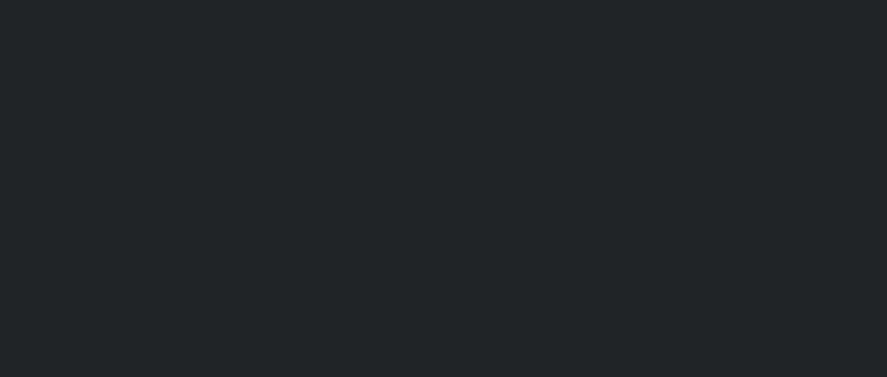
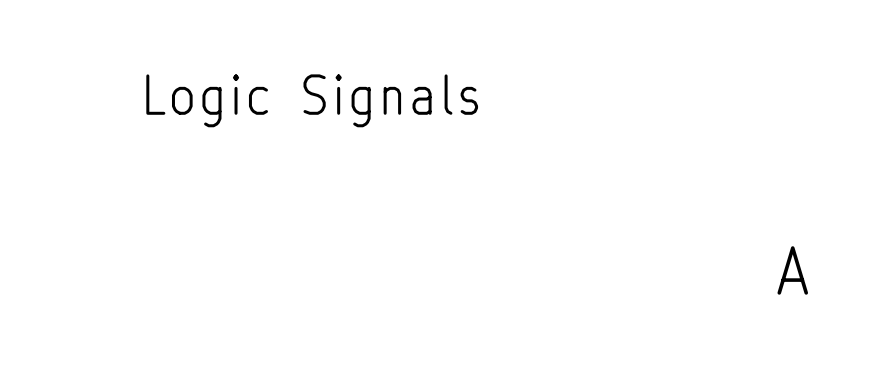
text: none -> Logic Signals (312, 100)
text: none -> A (792, 270)

